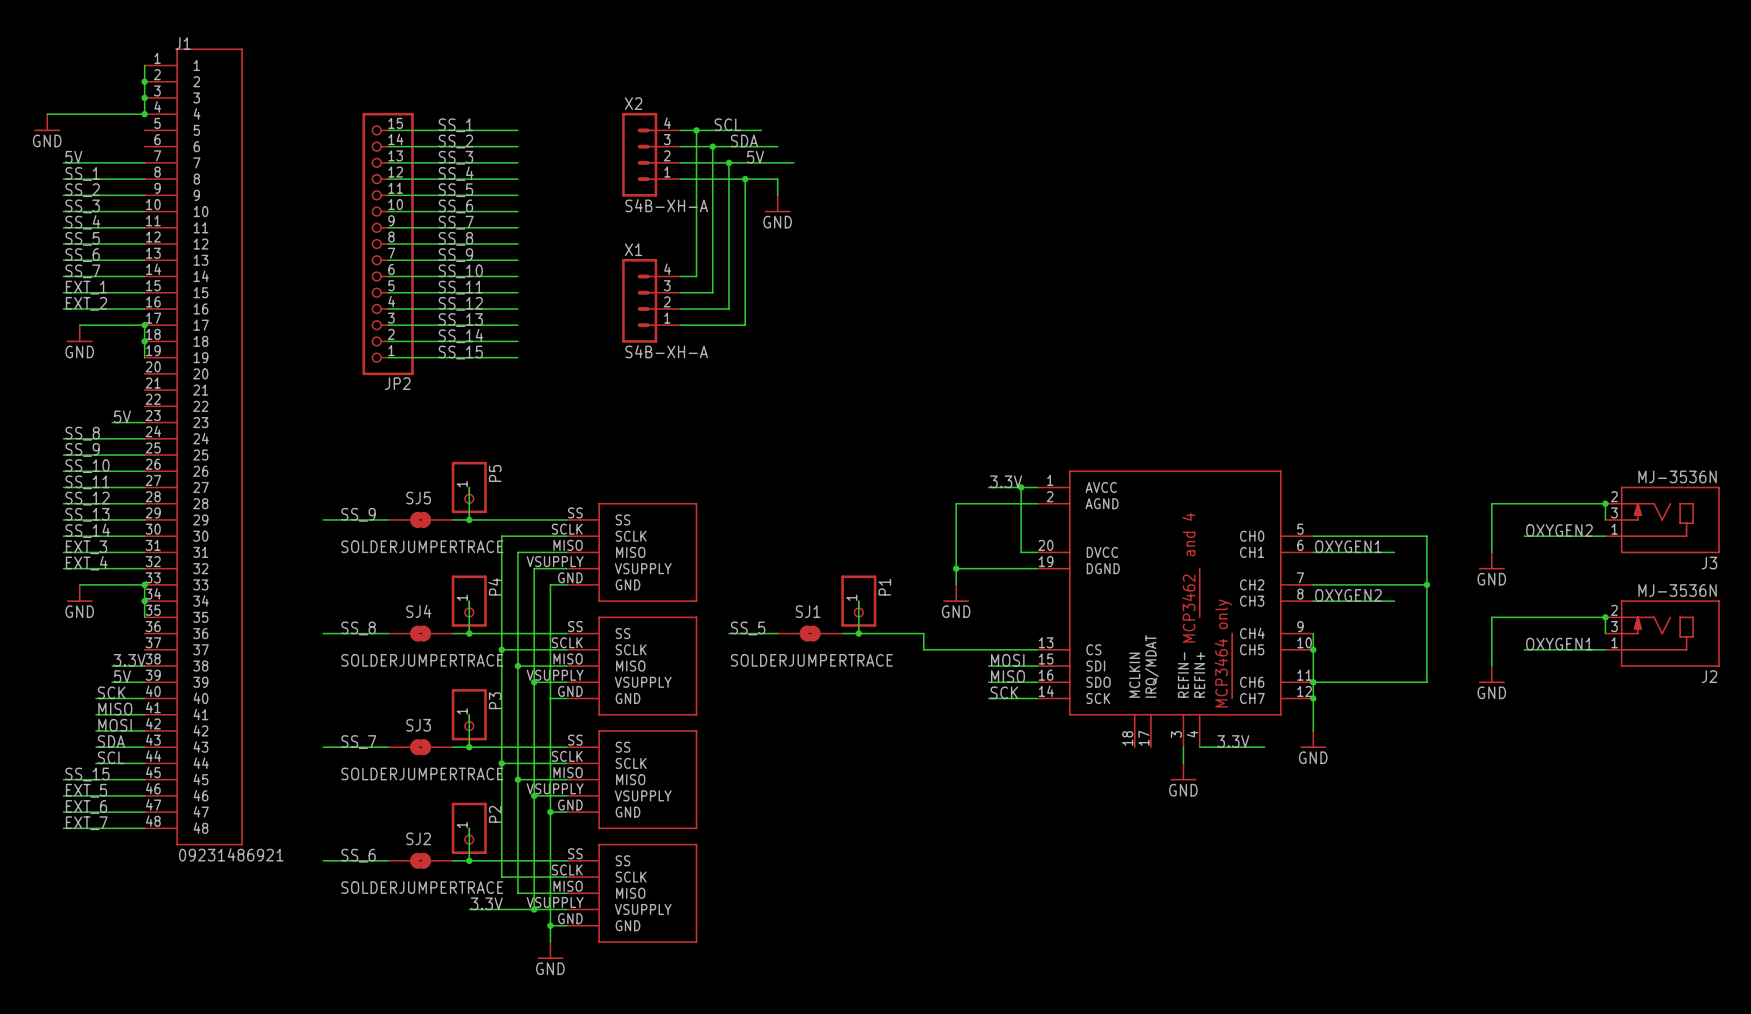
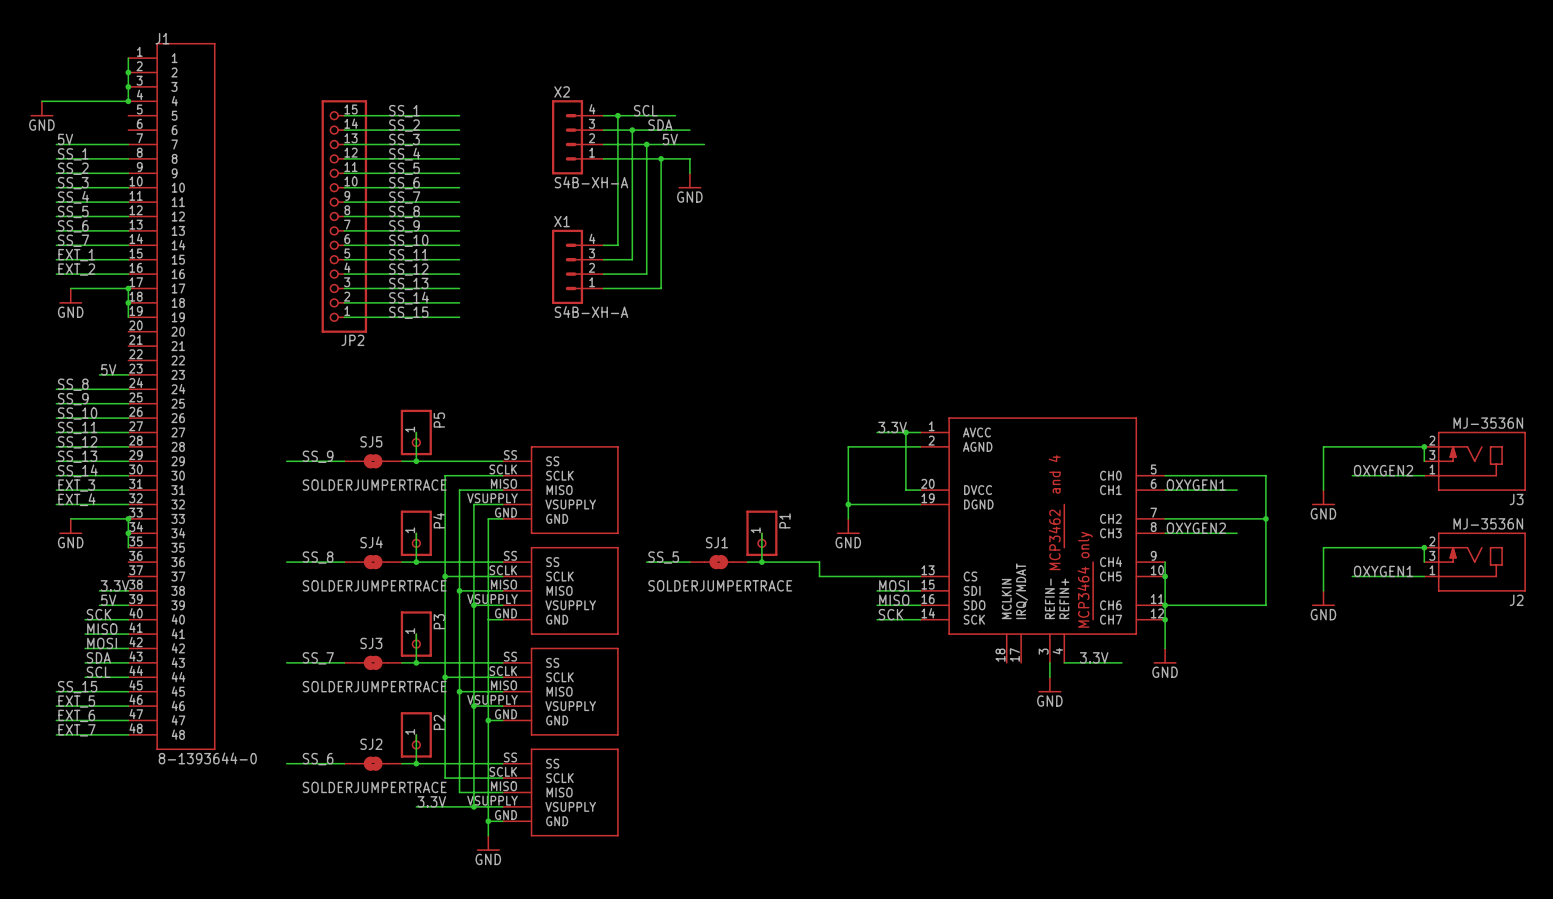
J1 value: 09231486921 (231, 854) -> 8-1393644-0 (207, 758)

